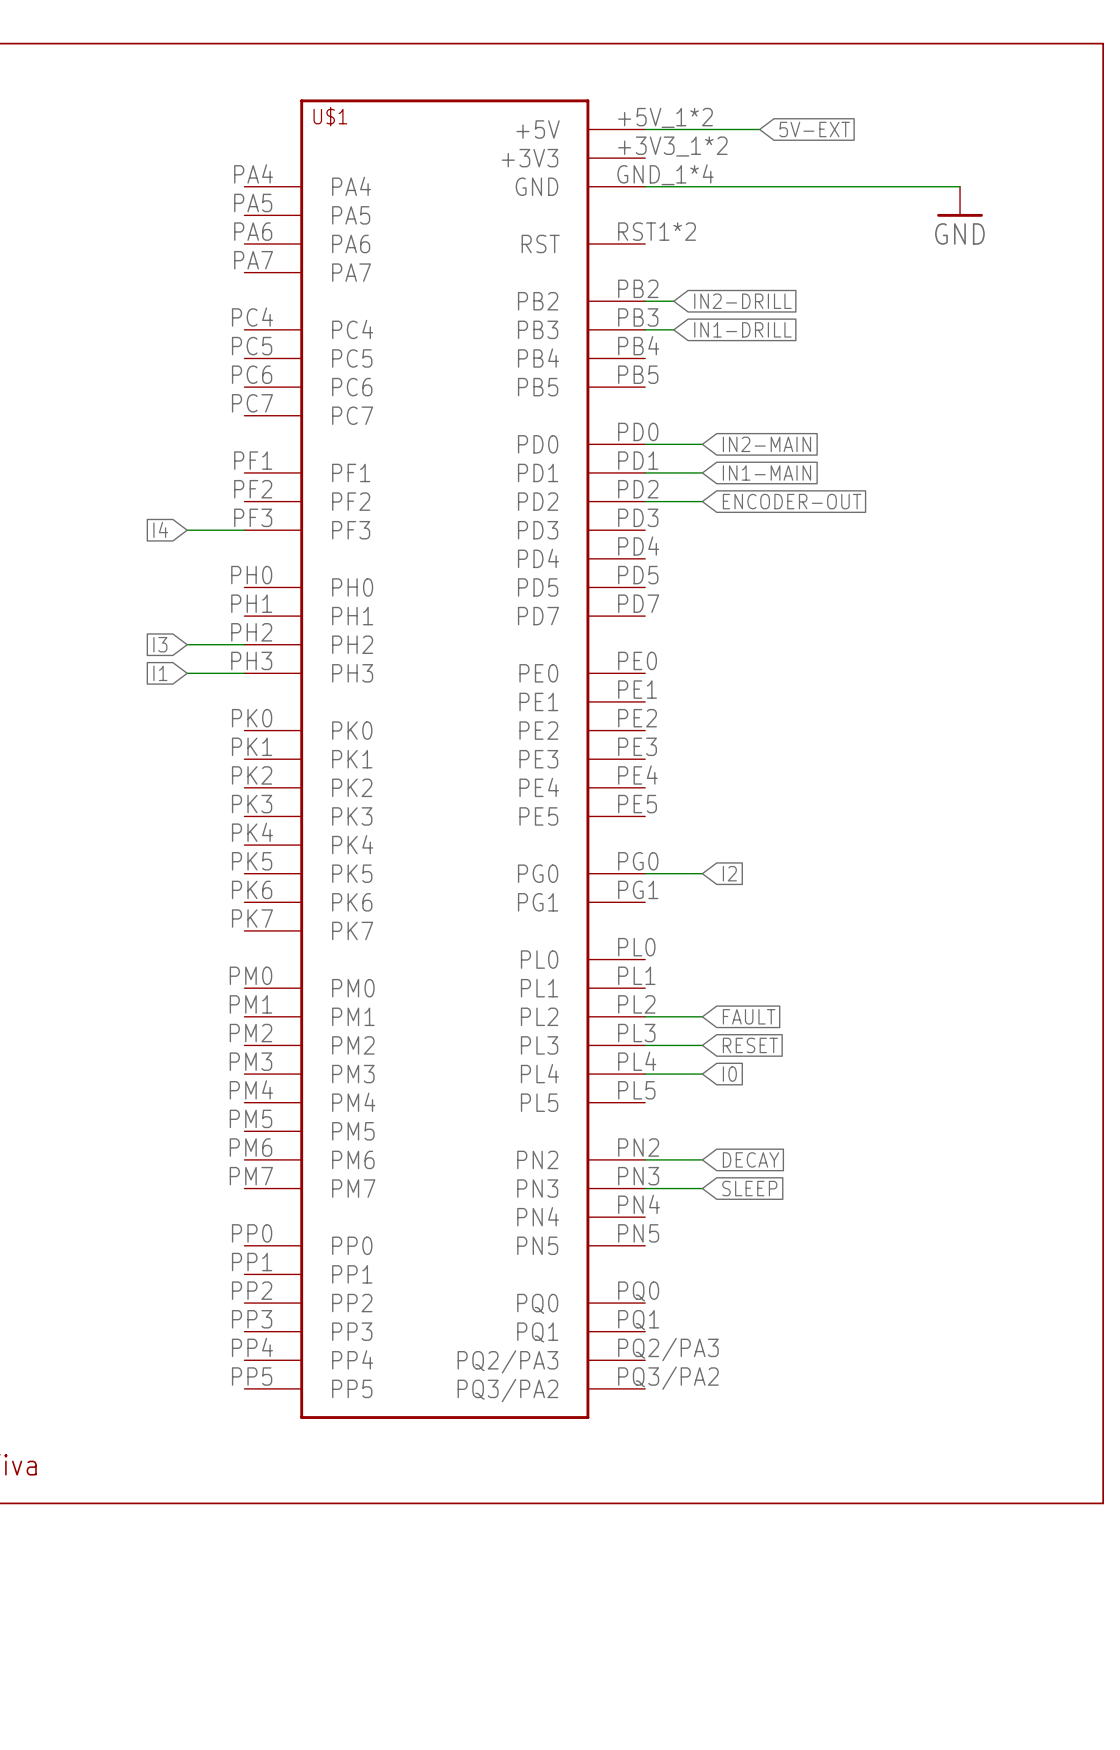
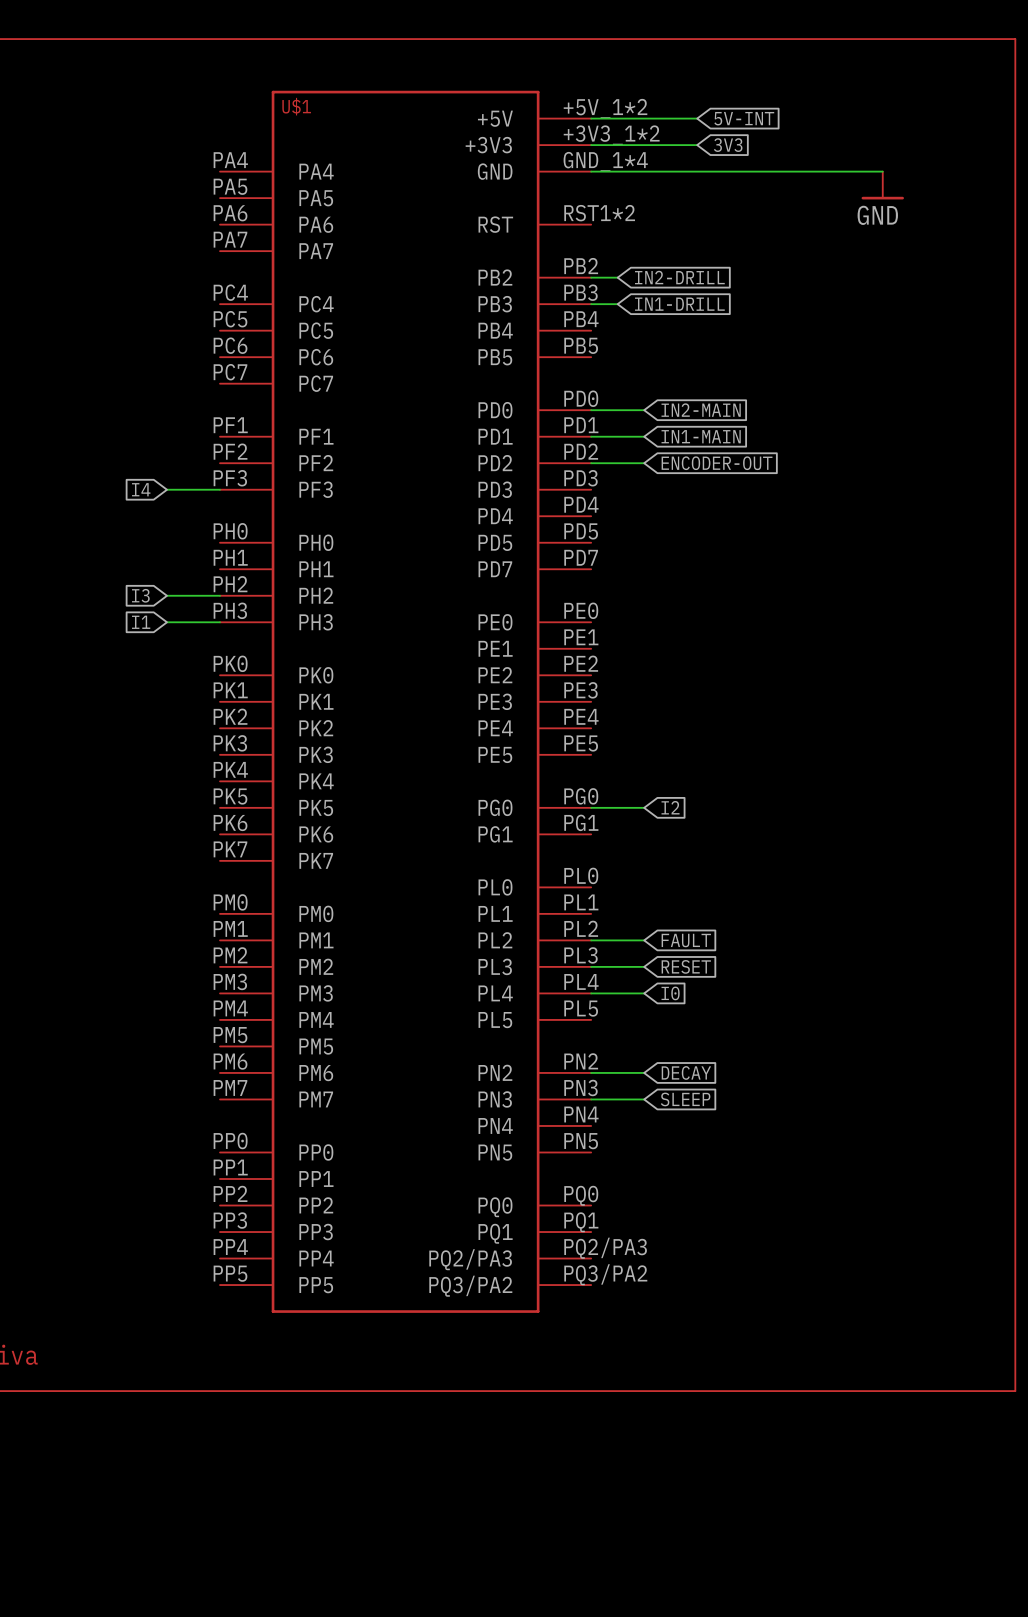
global label: 5V-EXT (814, 129) -> 5V-INT (744, 118)
wire: none -> (591, 145) (697, 145)
global label: none -> 3V3 (728, 145)

